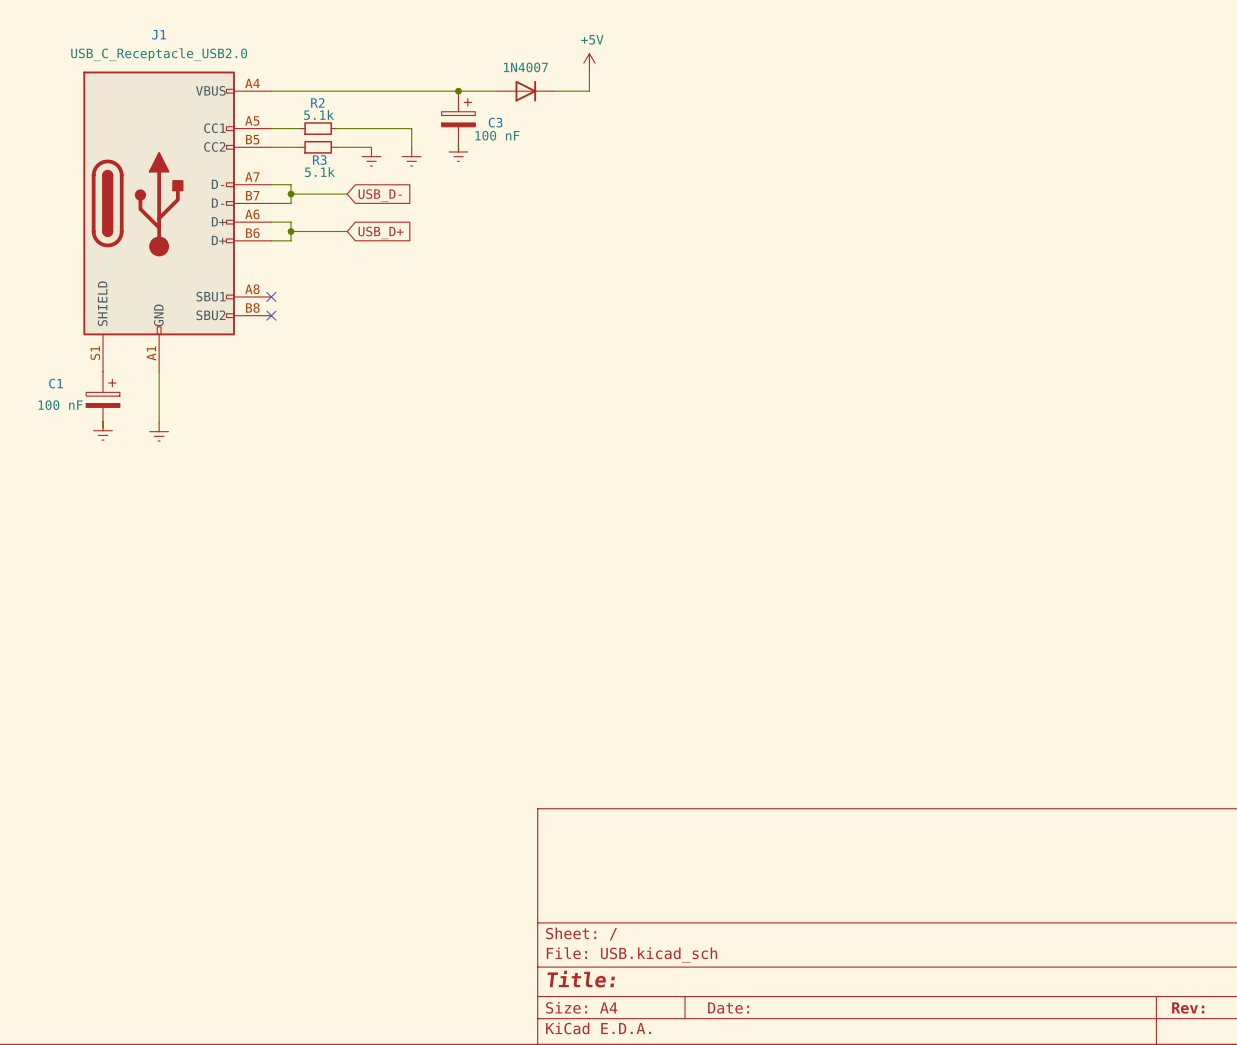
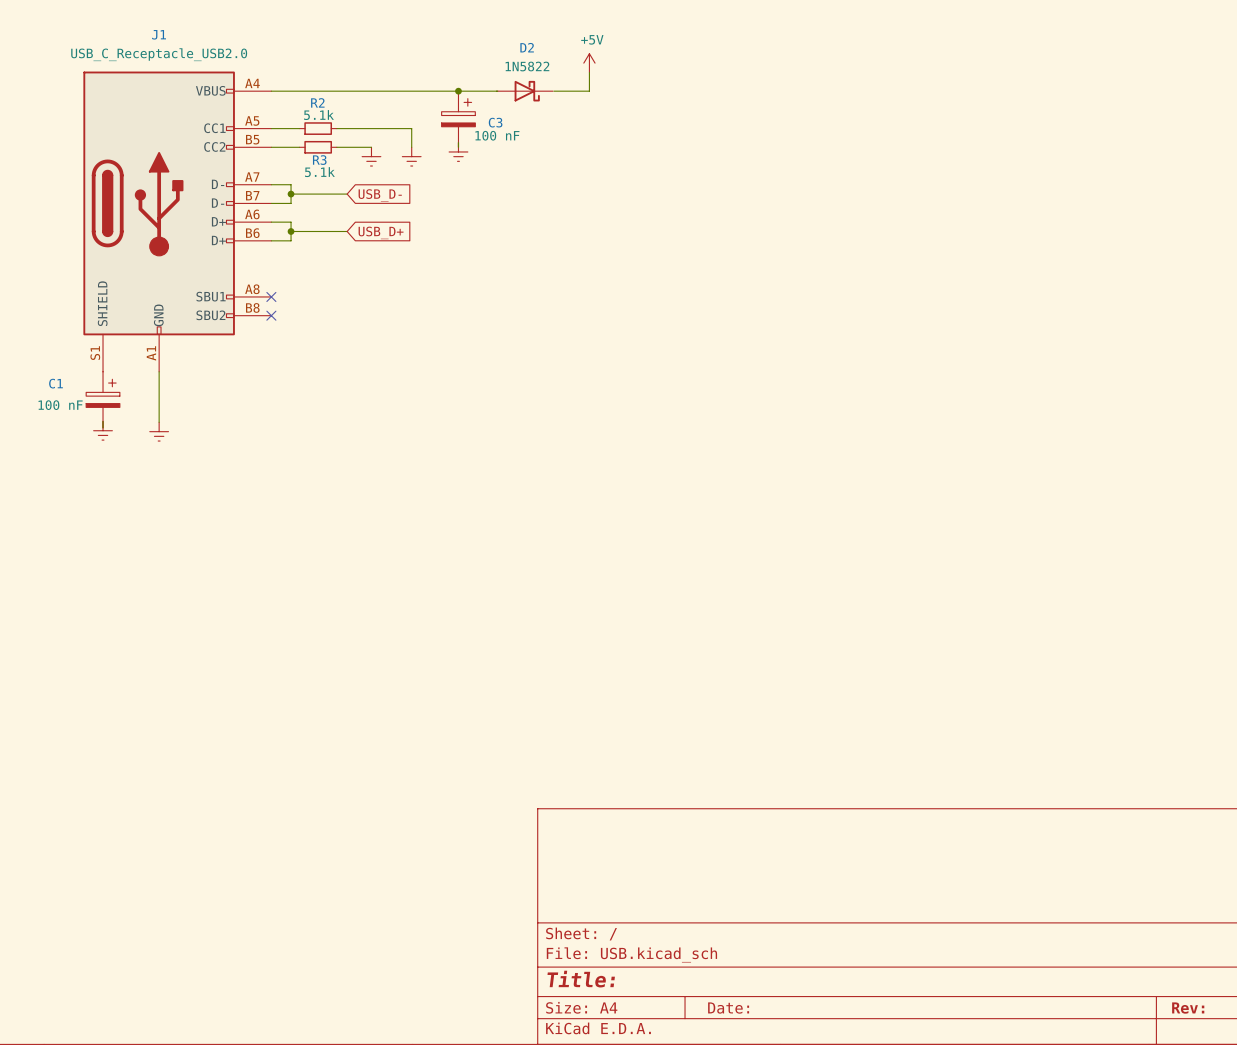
D2: none -> 1N5822 (524, 91)
part: 1N4007 (525, 91) -> none

